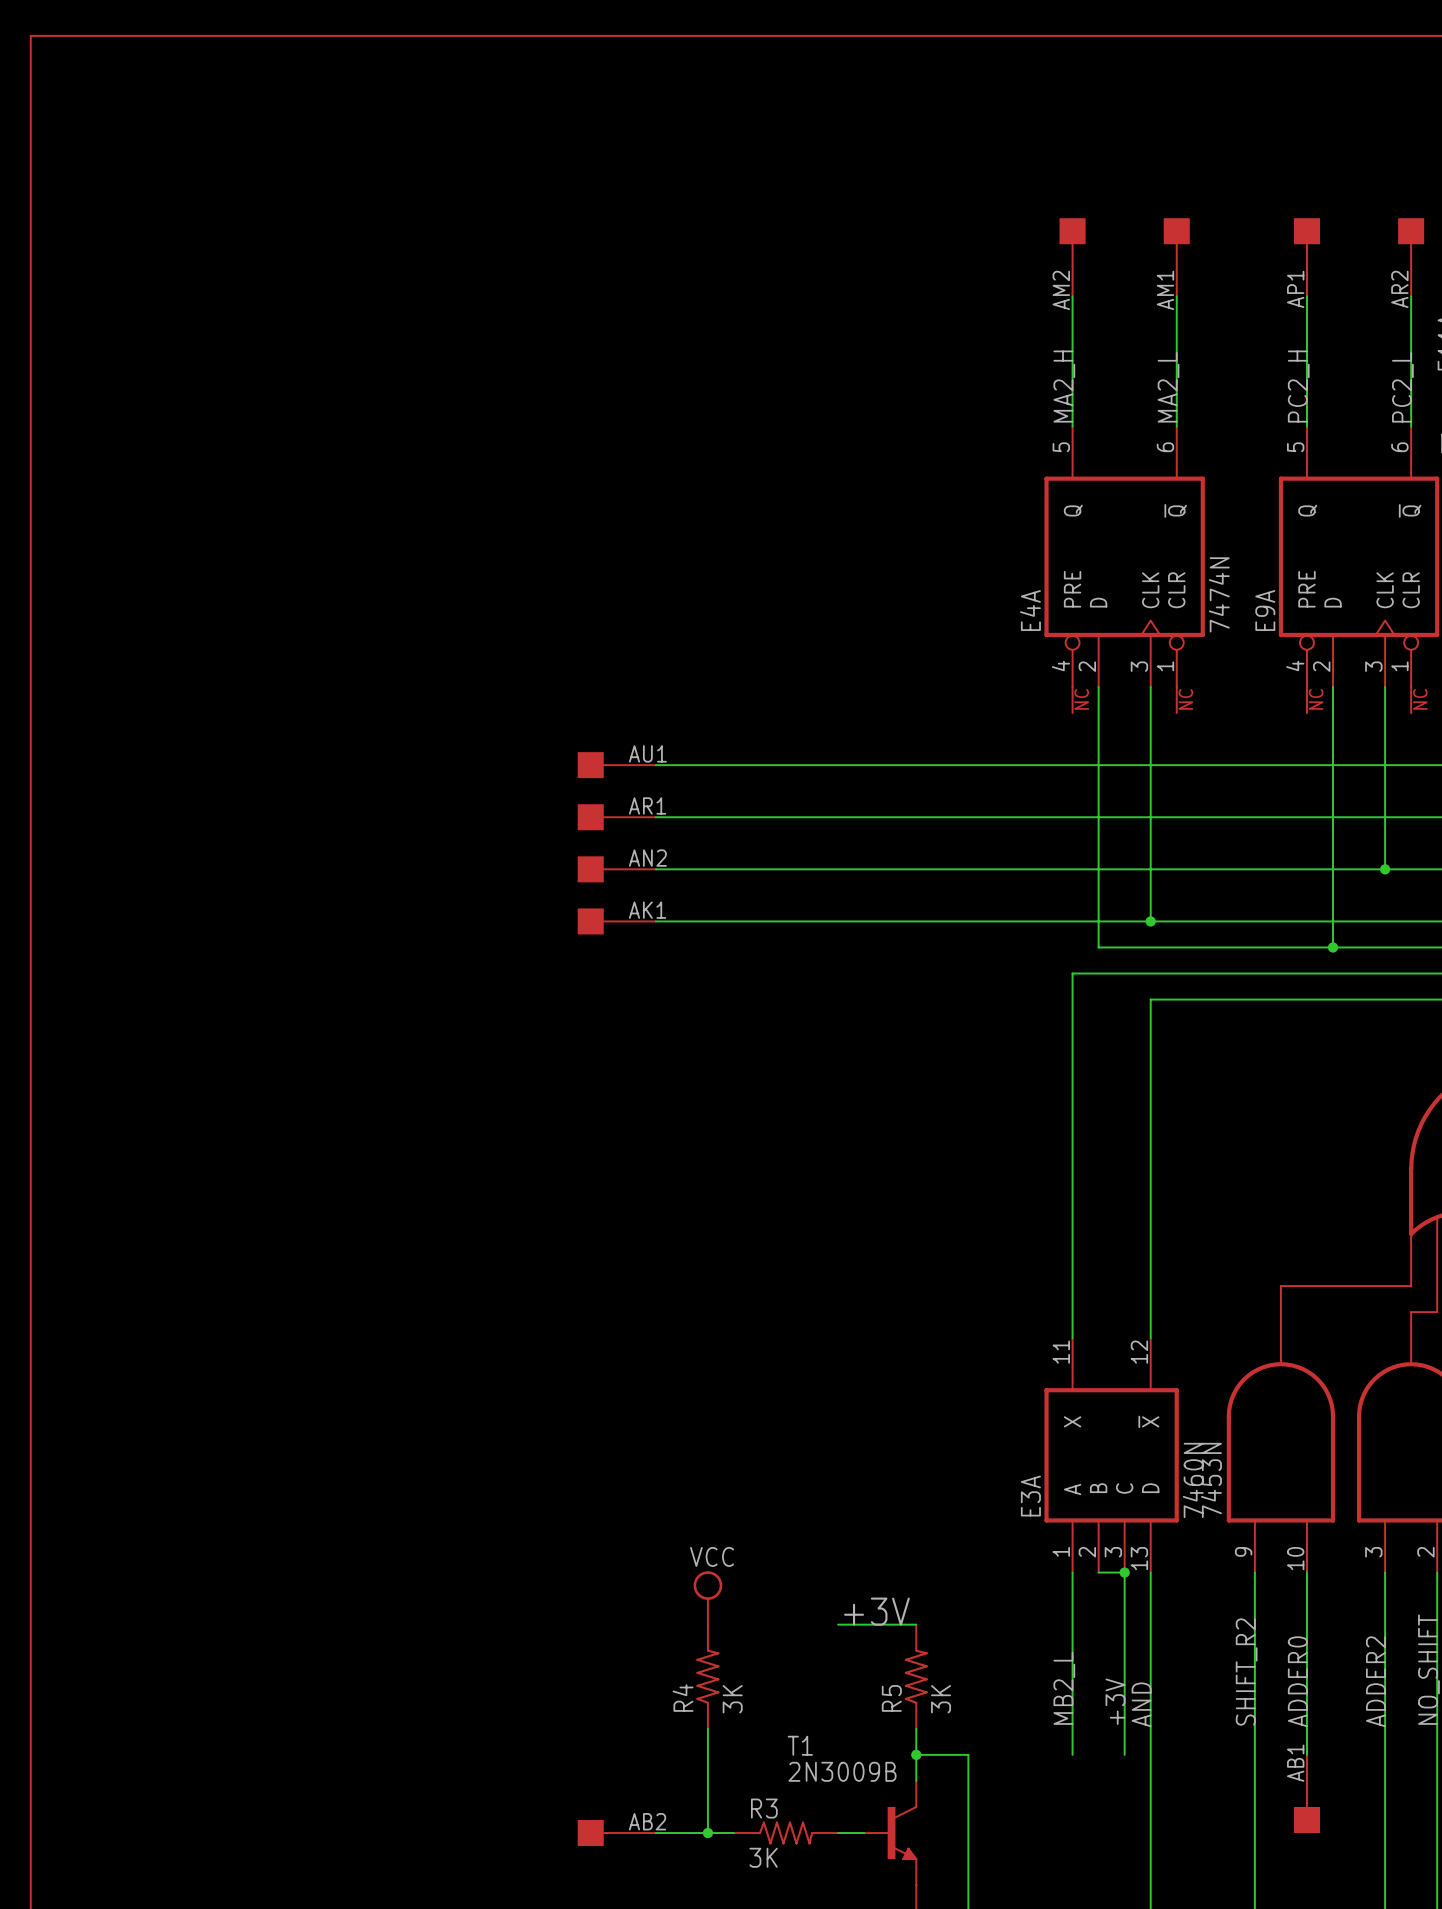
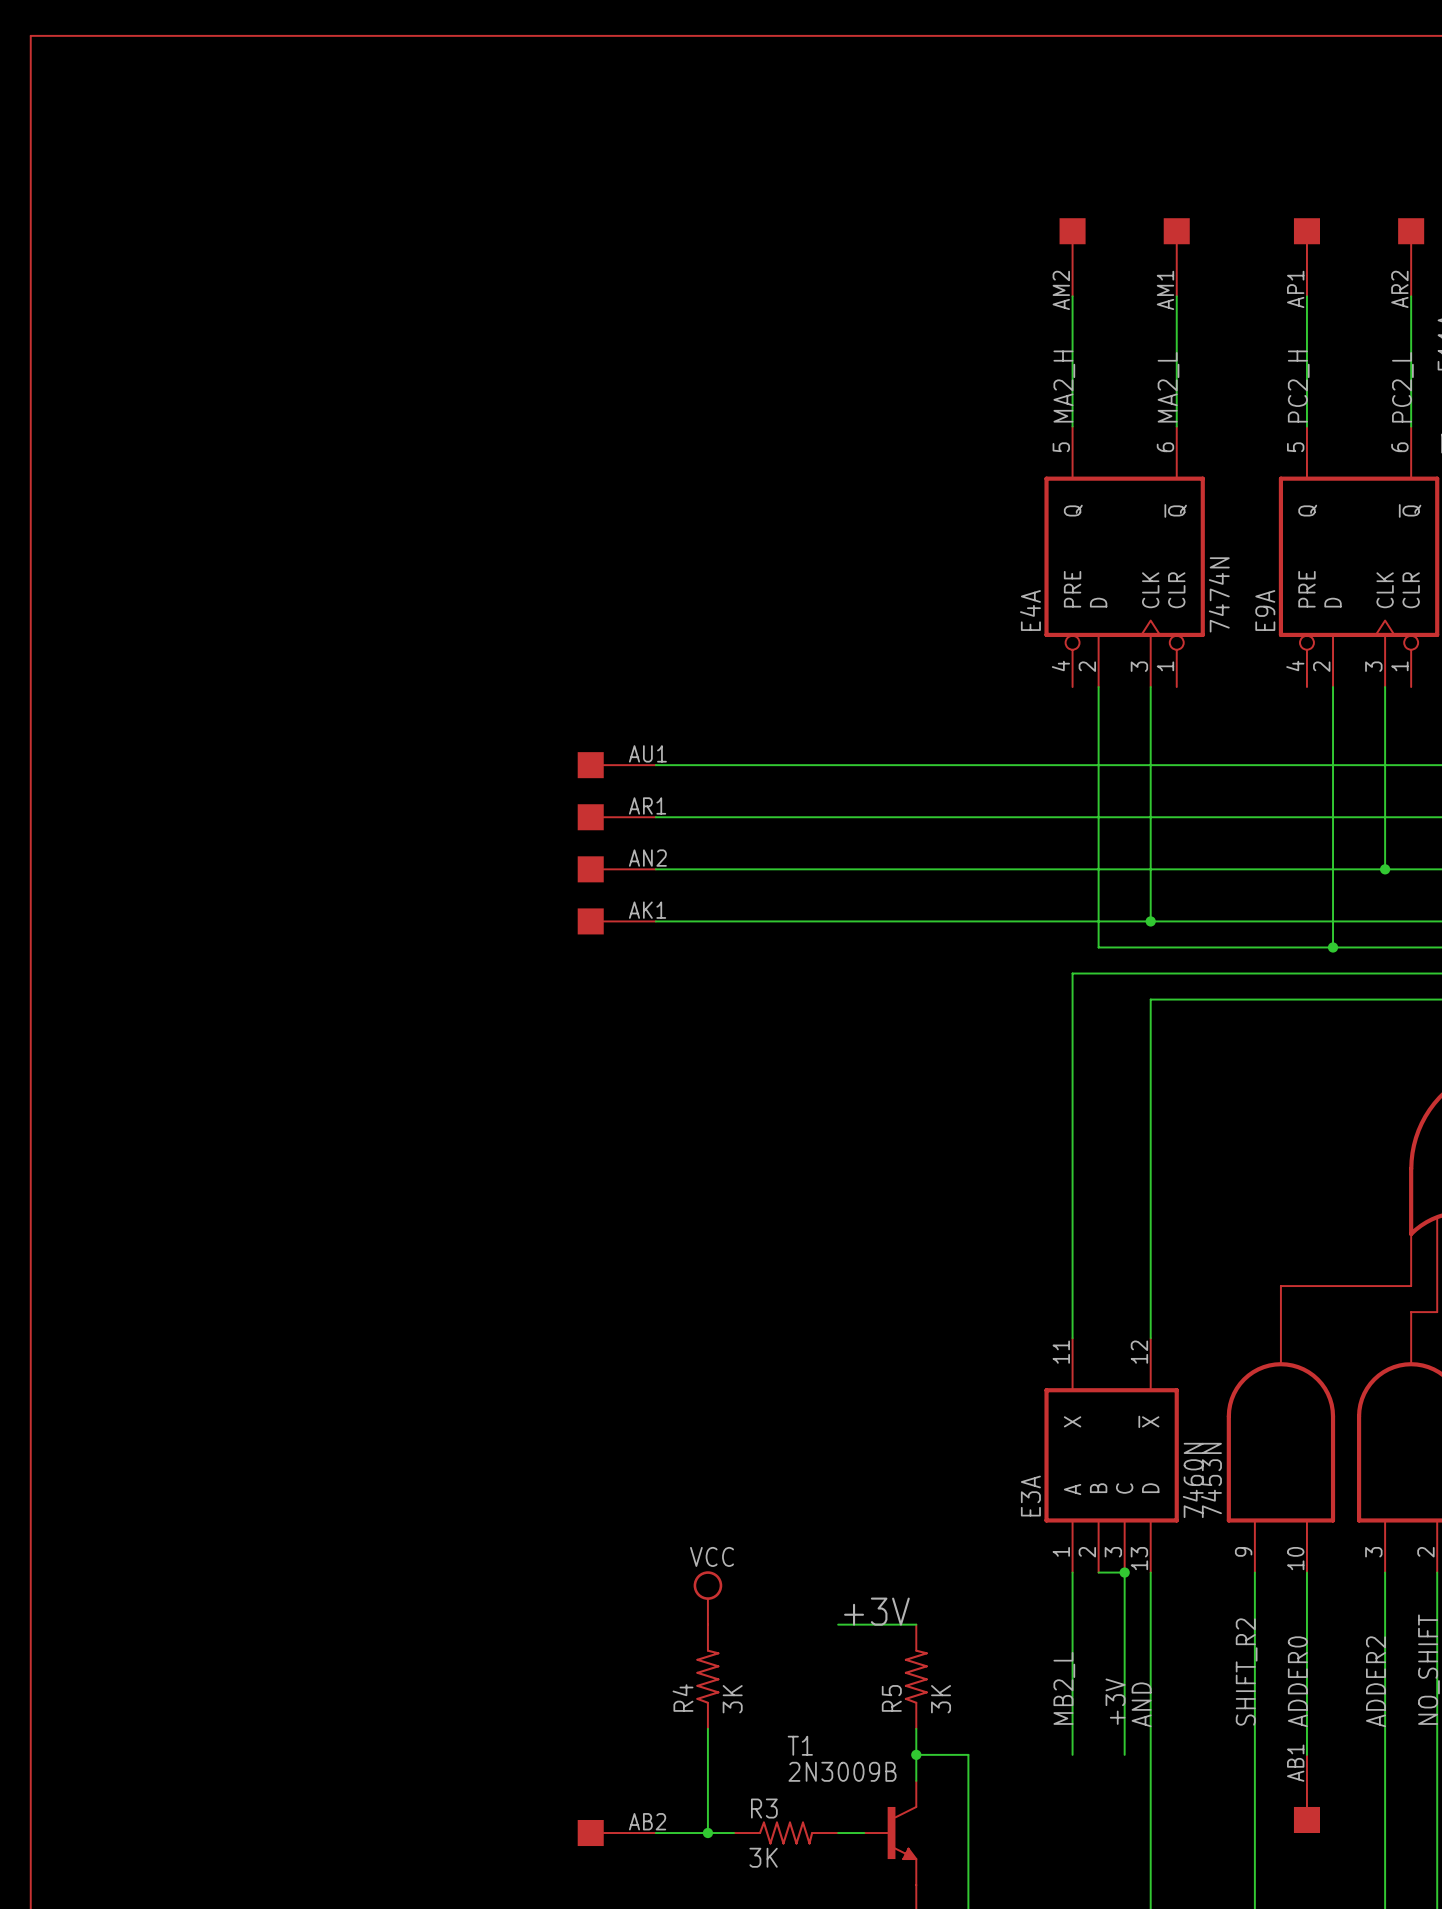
power symbol: (1072, 700) -> none
power symbol: (1176, 700) -> none
power symbol: (1306, 700) -> none
power symbol: (1411, 700) -> none

